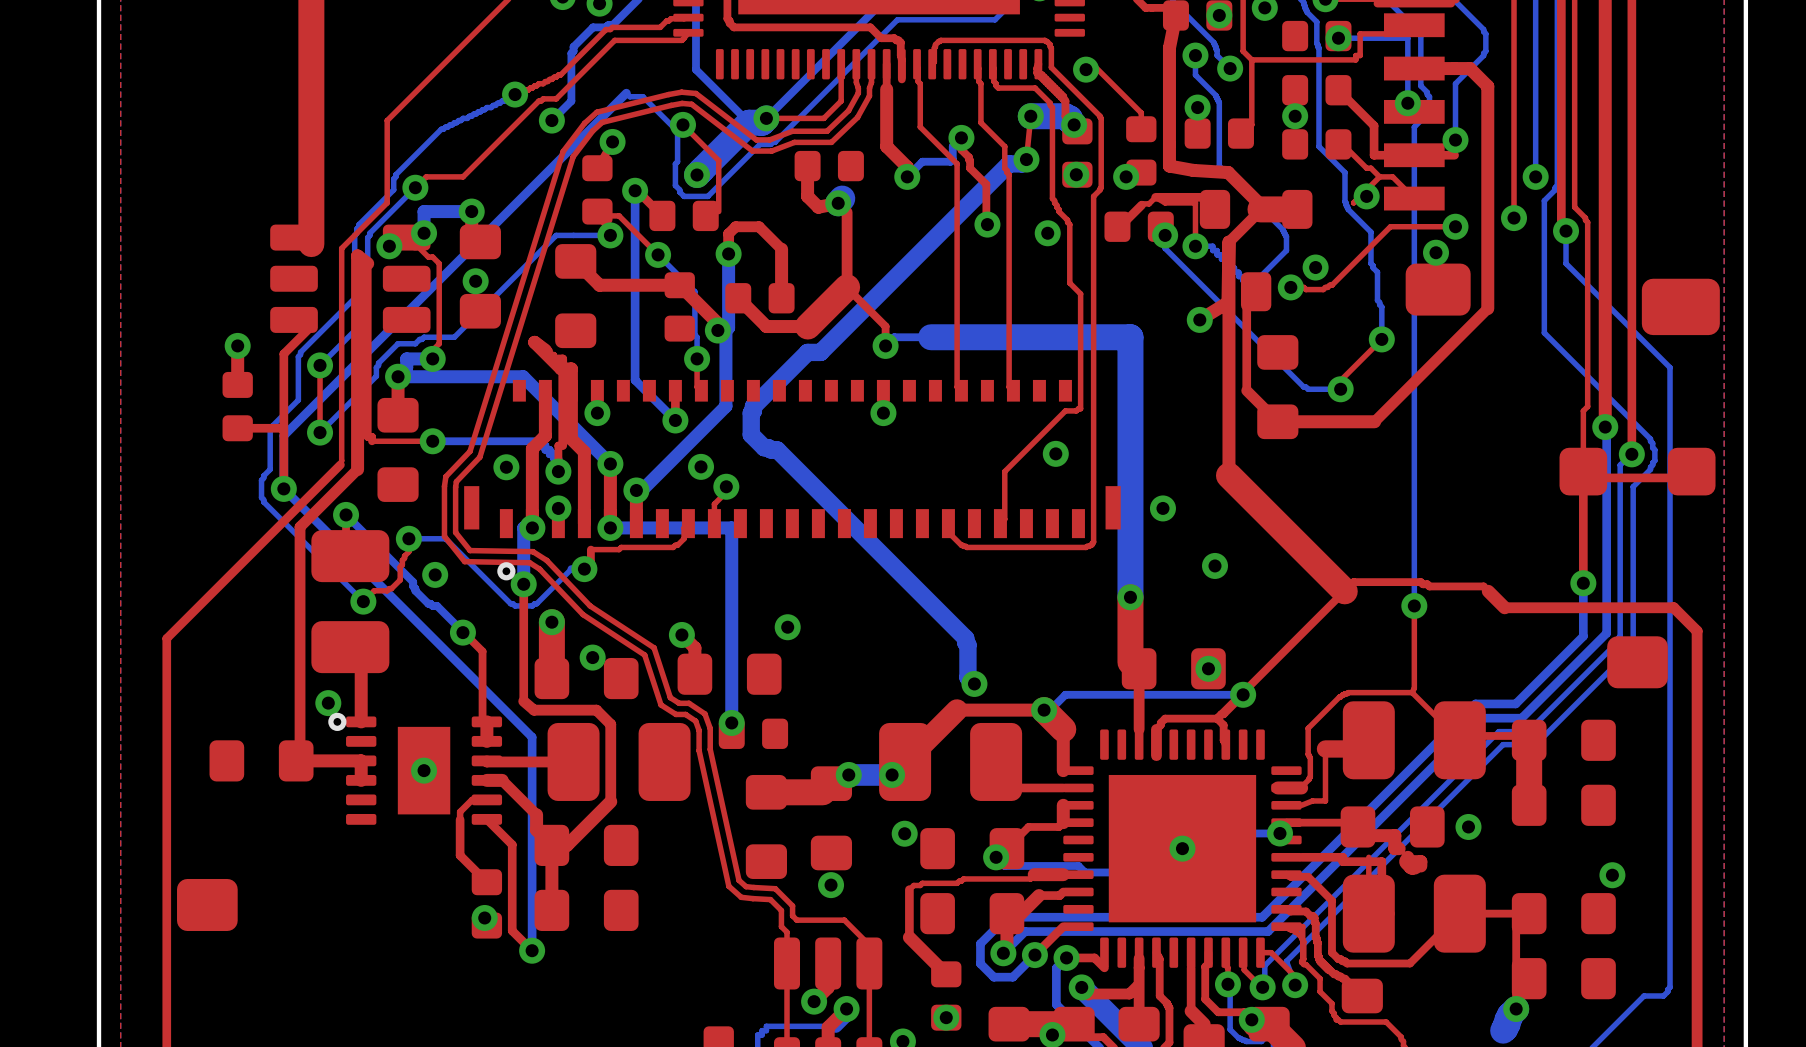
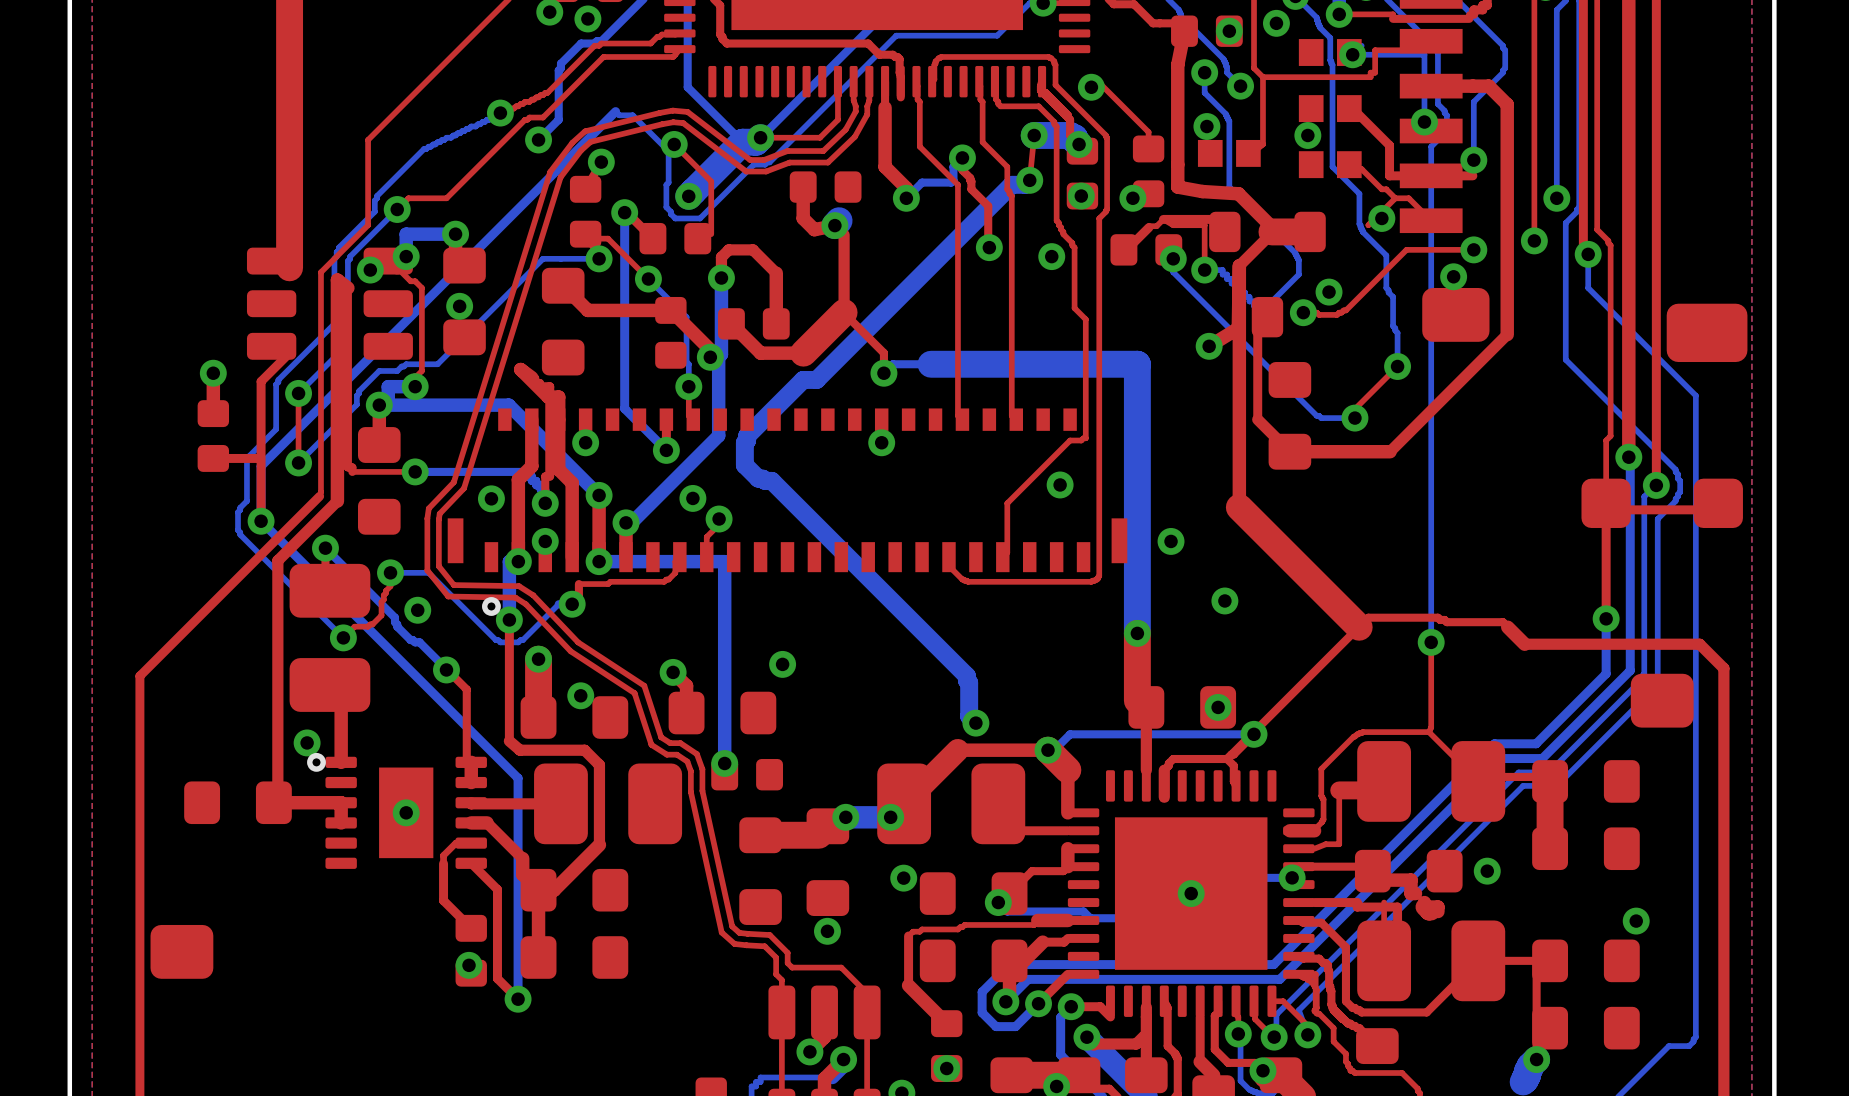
part footprint: [1282, 20, 1352, 52] -> [1298, 39, 1362, 66]
part footprint: [1282, 75, 1352, 106] -> [1298, 95, 1362, 123]
part footprint: [1184, 118, 1254, 149] -> [1197, 139, 1261, 167]
part footprint: [1282, 129, 1352, 160] -> [1298, 151, 1362, 179]

